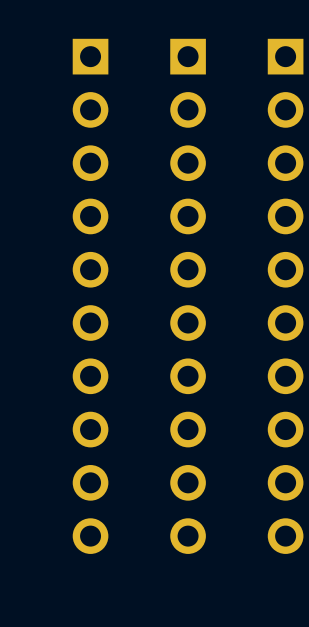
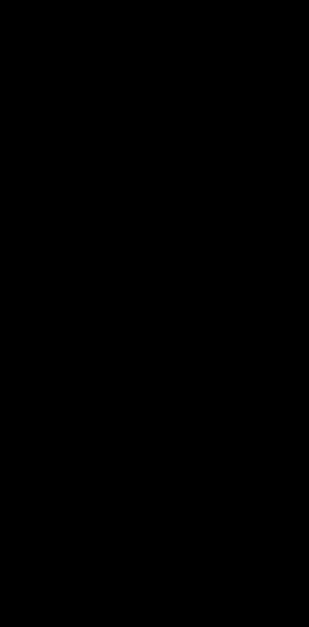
part: (90, 296) -> none
part: (188, 296) -> none
part: (285, 296) -> none

